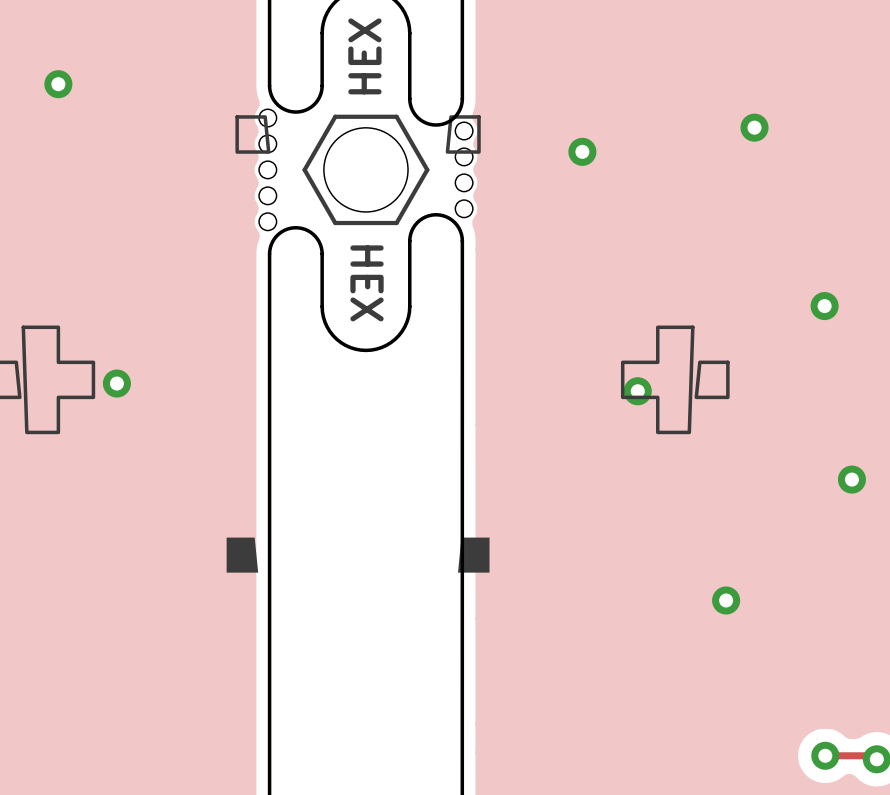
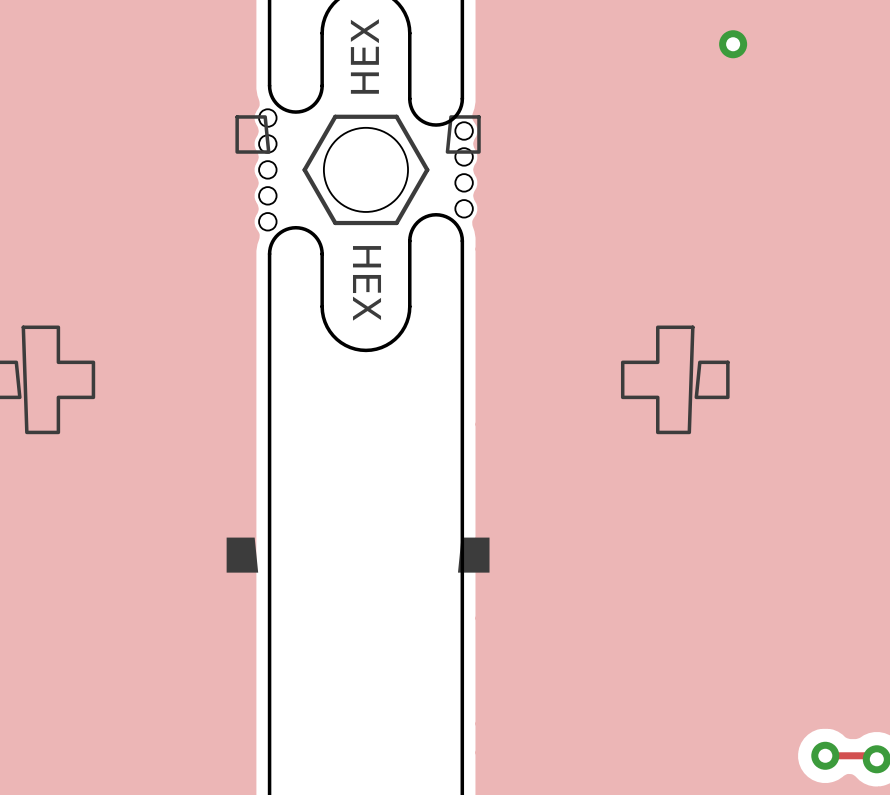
via: (58, 84) -> none
via position: (754, 127) -> (733, 44)
via: (582, 151) -> none
via: (824, 306) -> none
via: (116, 383) -> none
via: (637, 391) -> none
via: (851, 479) -> none
via: (726, 600) -> none

